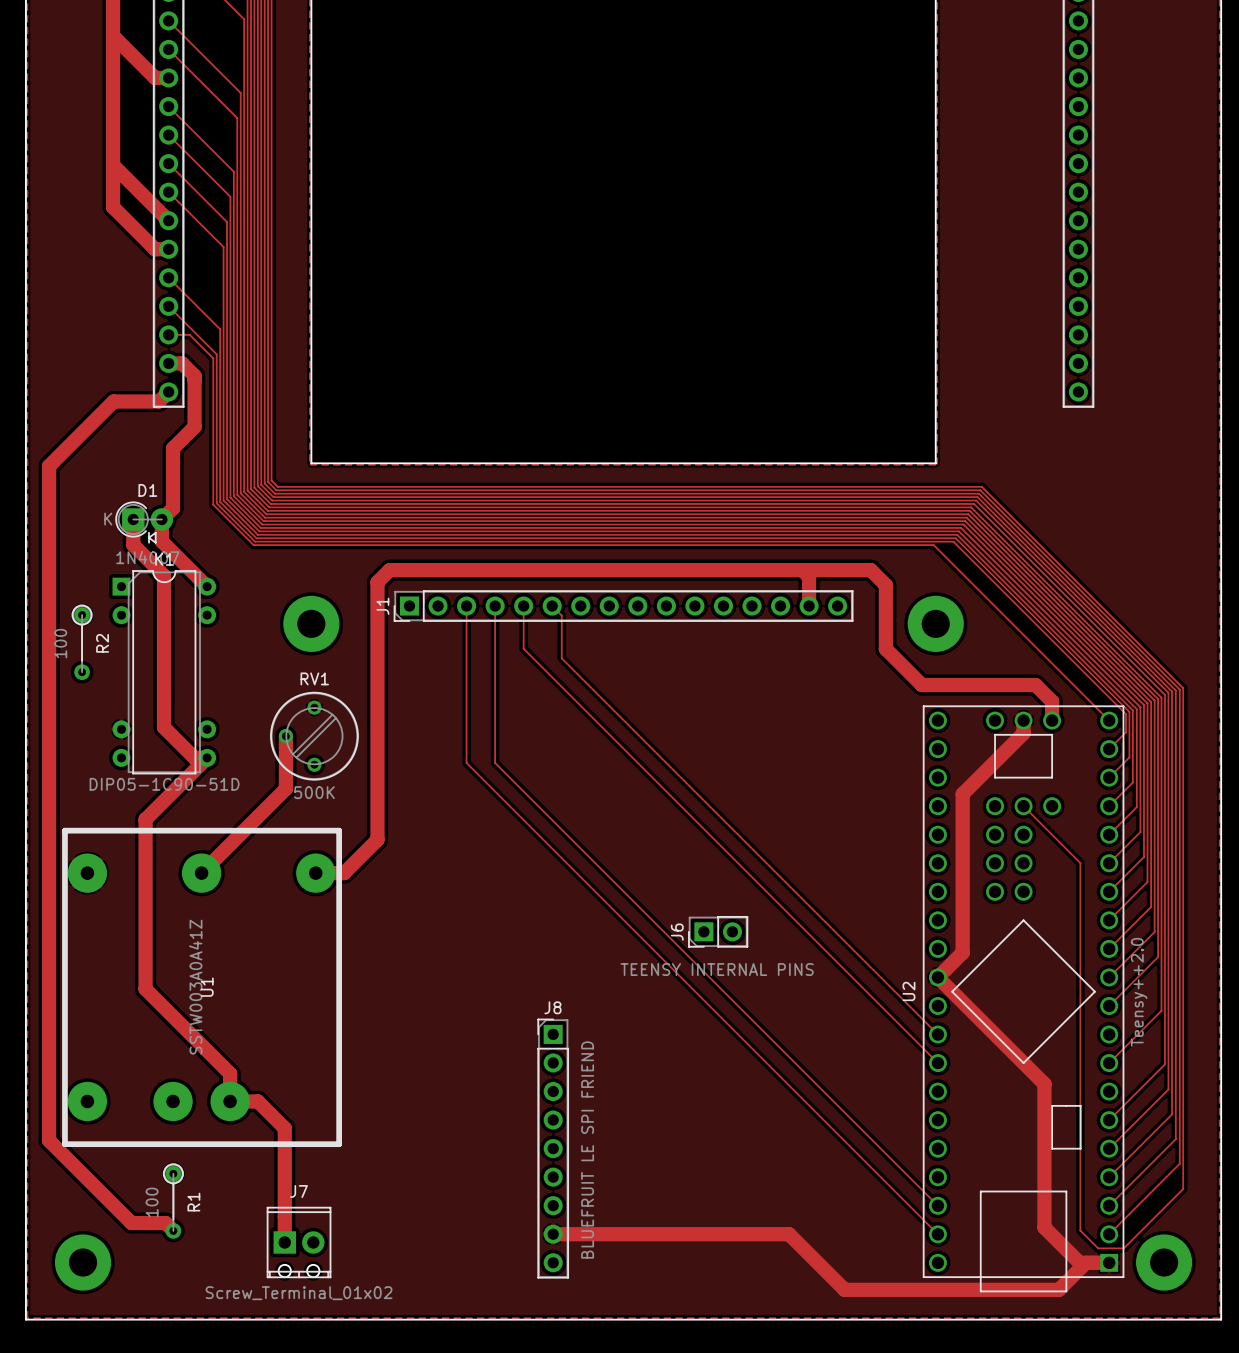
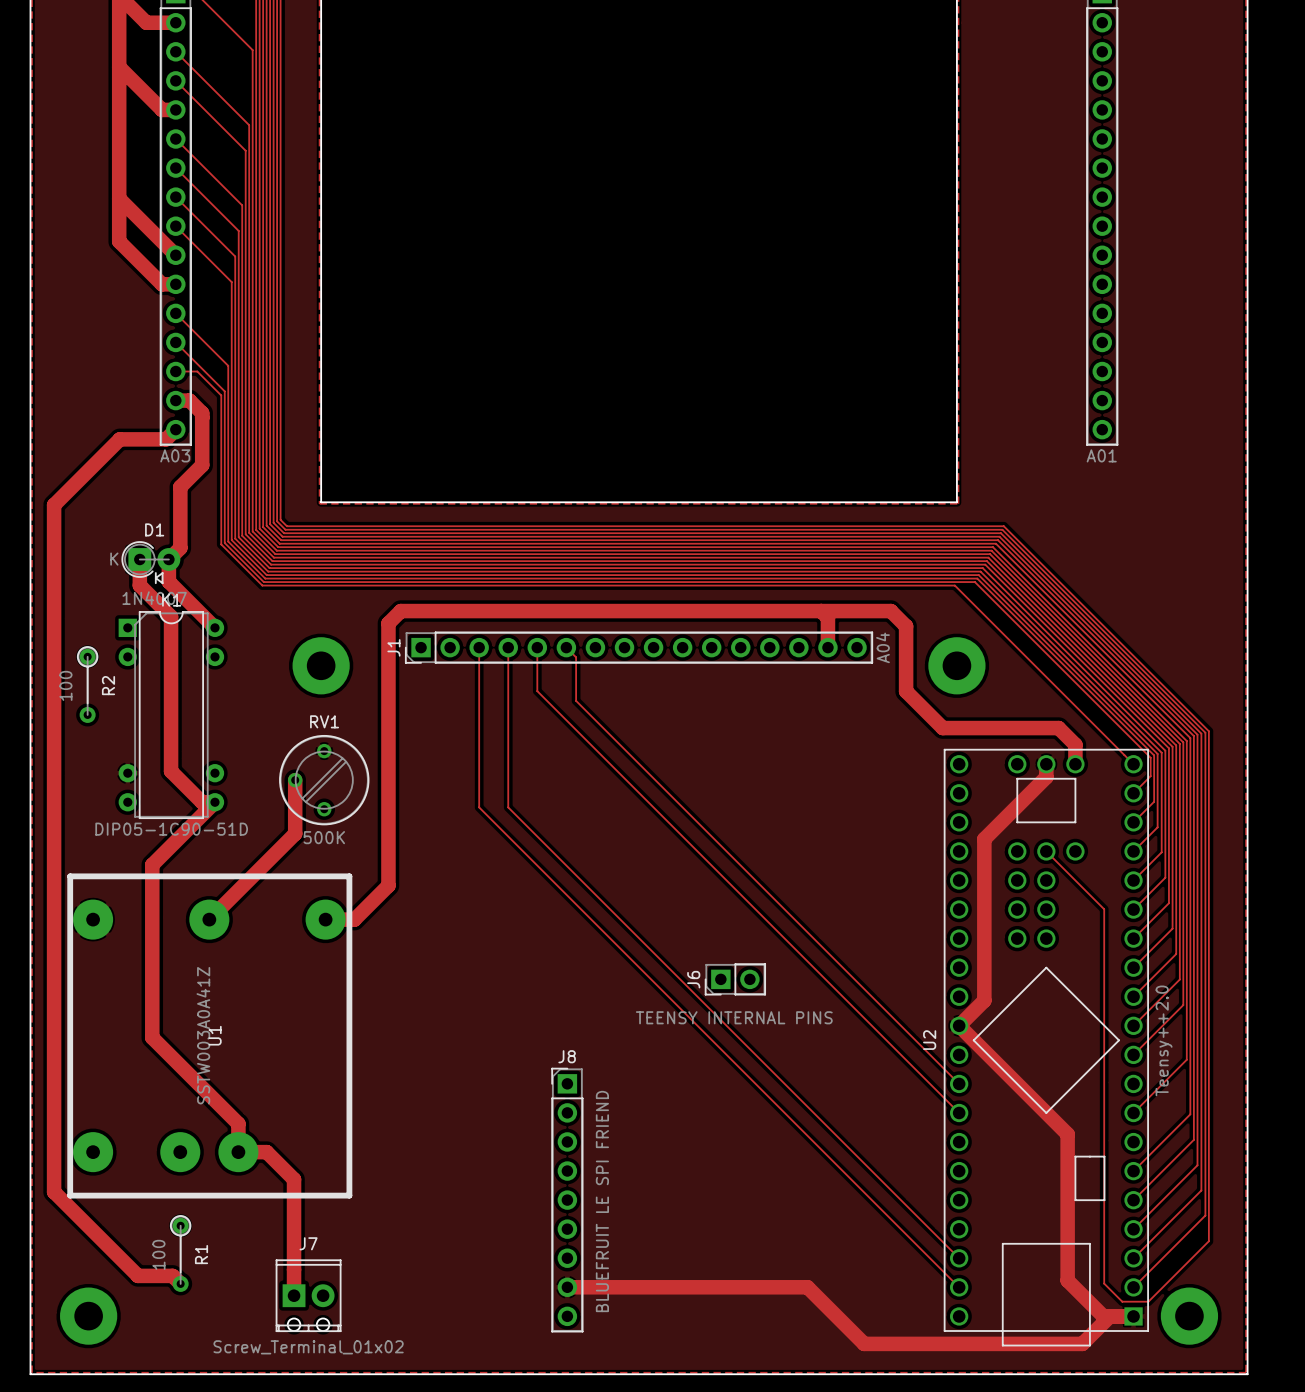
part value: none -> A03 (175, 455)
part value: none -> A01 (1101, 455)
J1 value: none -> A04 (882, 647)

